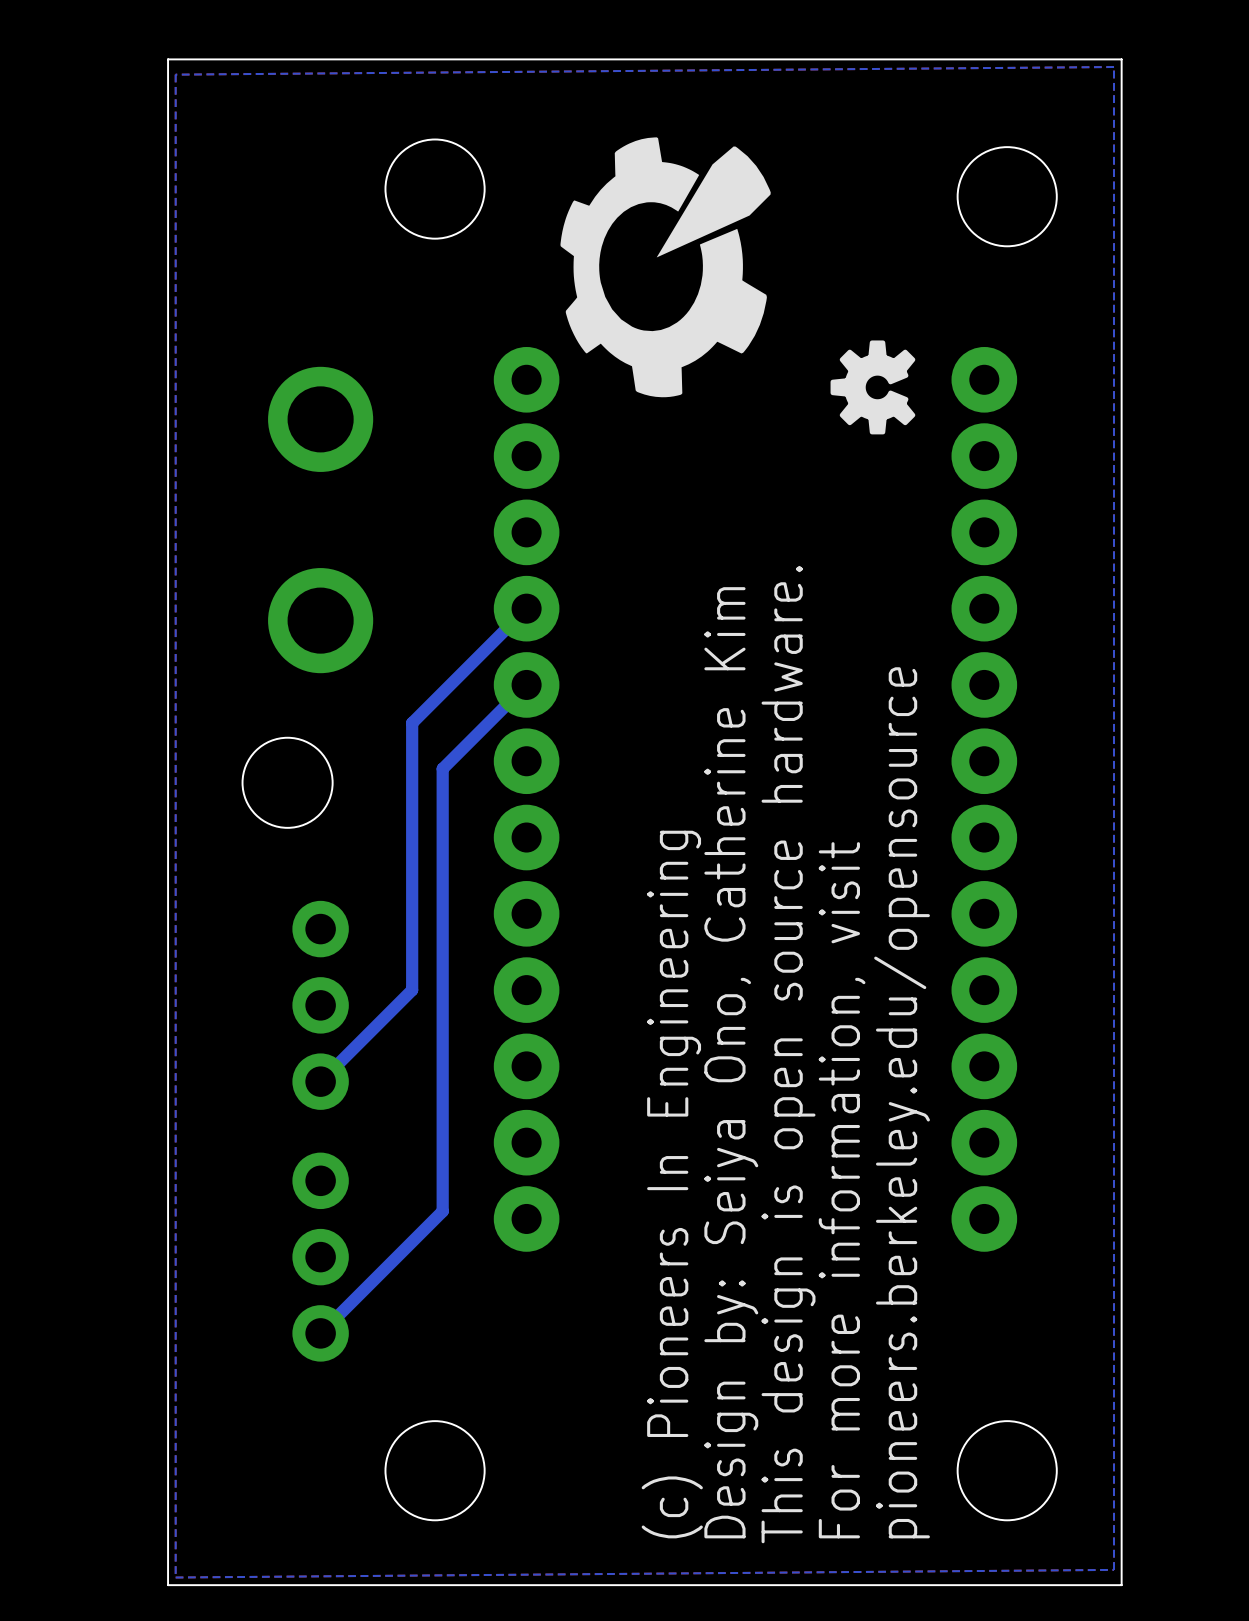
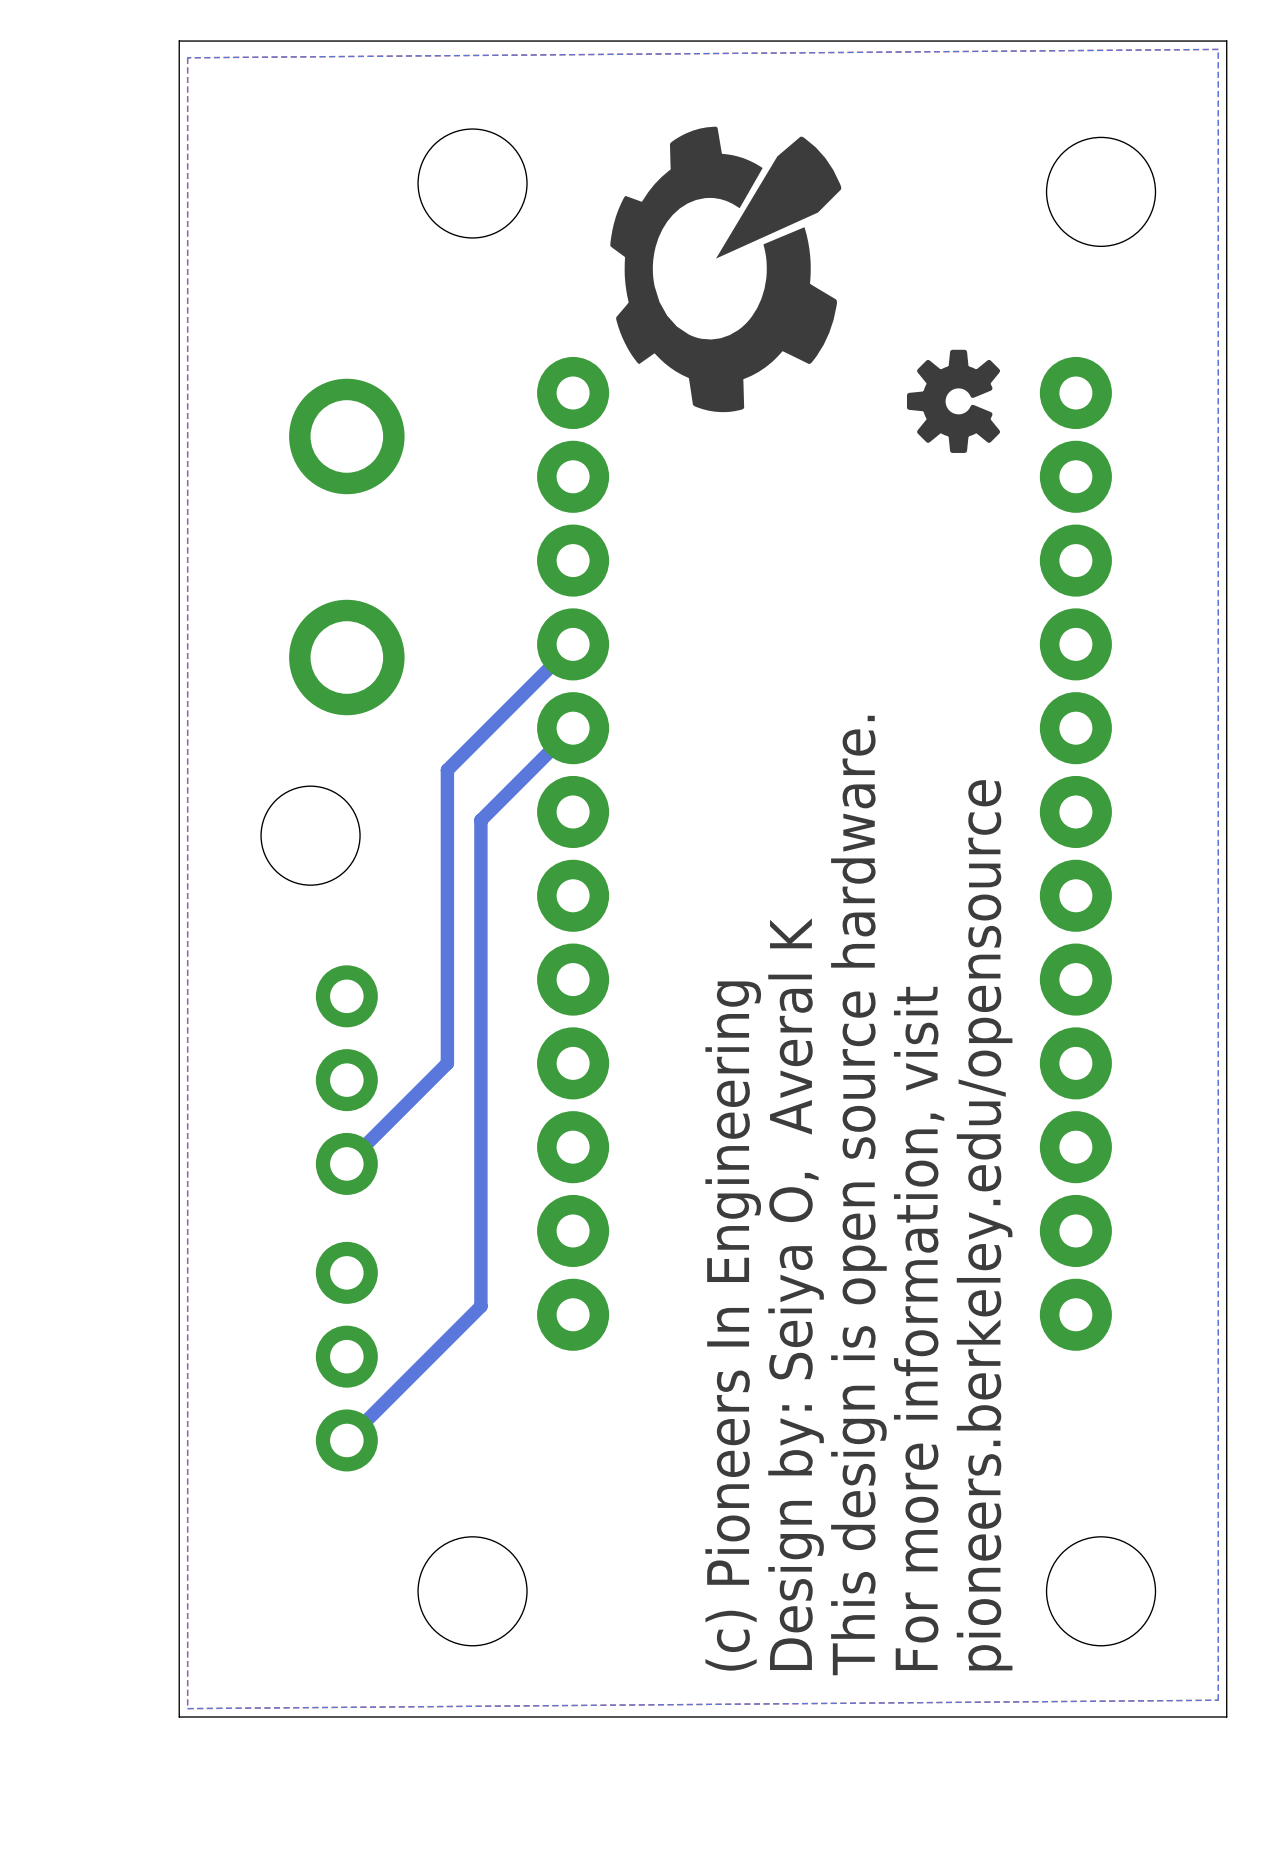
text: Design by: Seiya Ono, Catherine Kim (731, 1062) -> Design by: Seiya O, Averal K (796, 1294)

